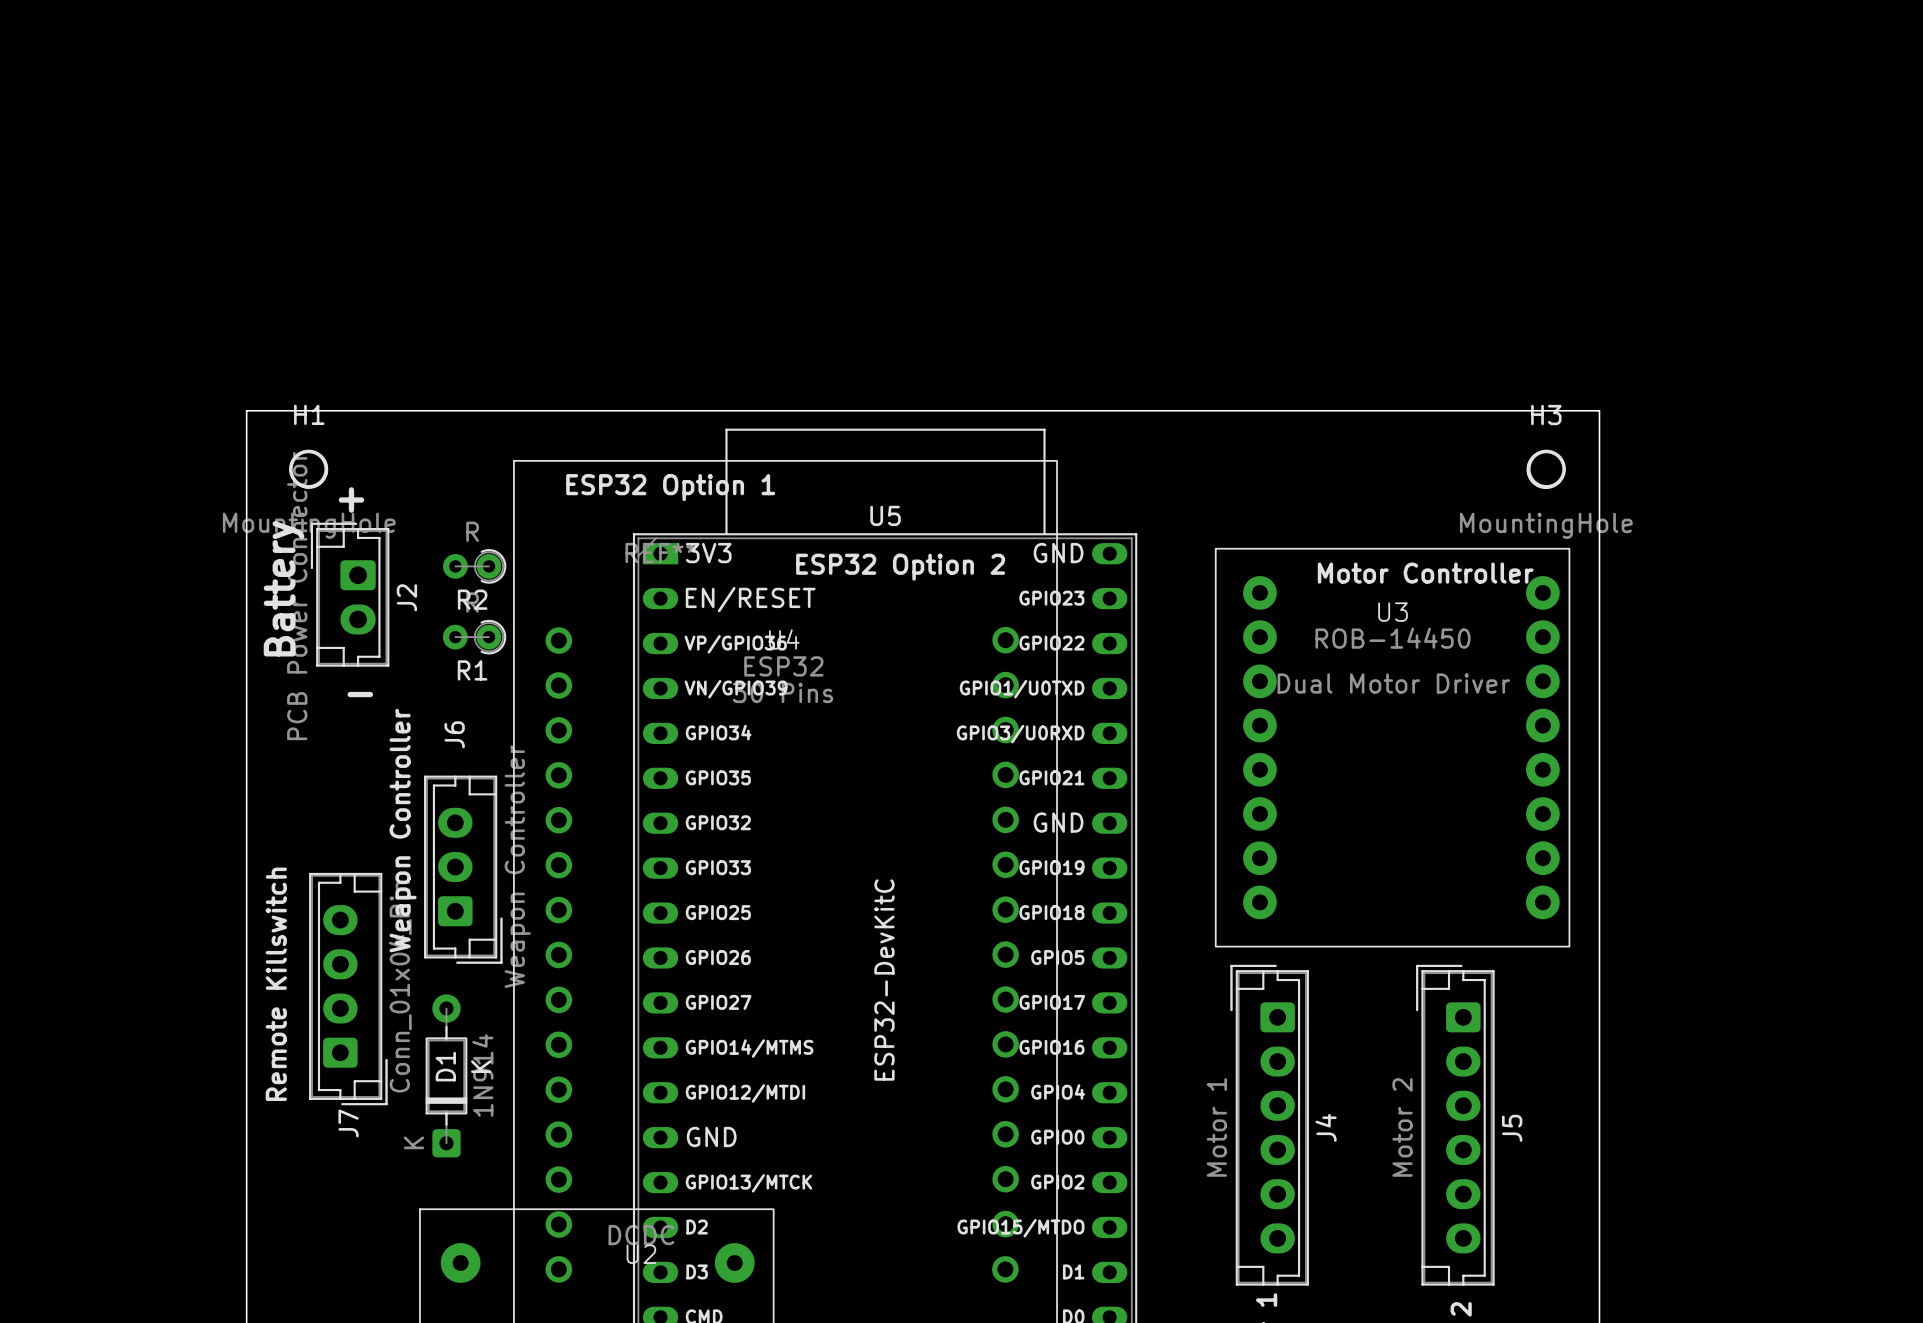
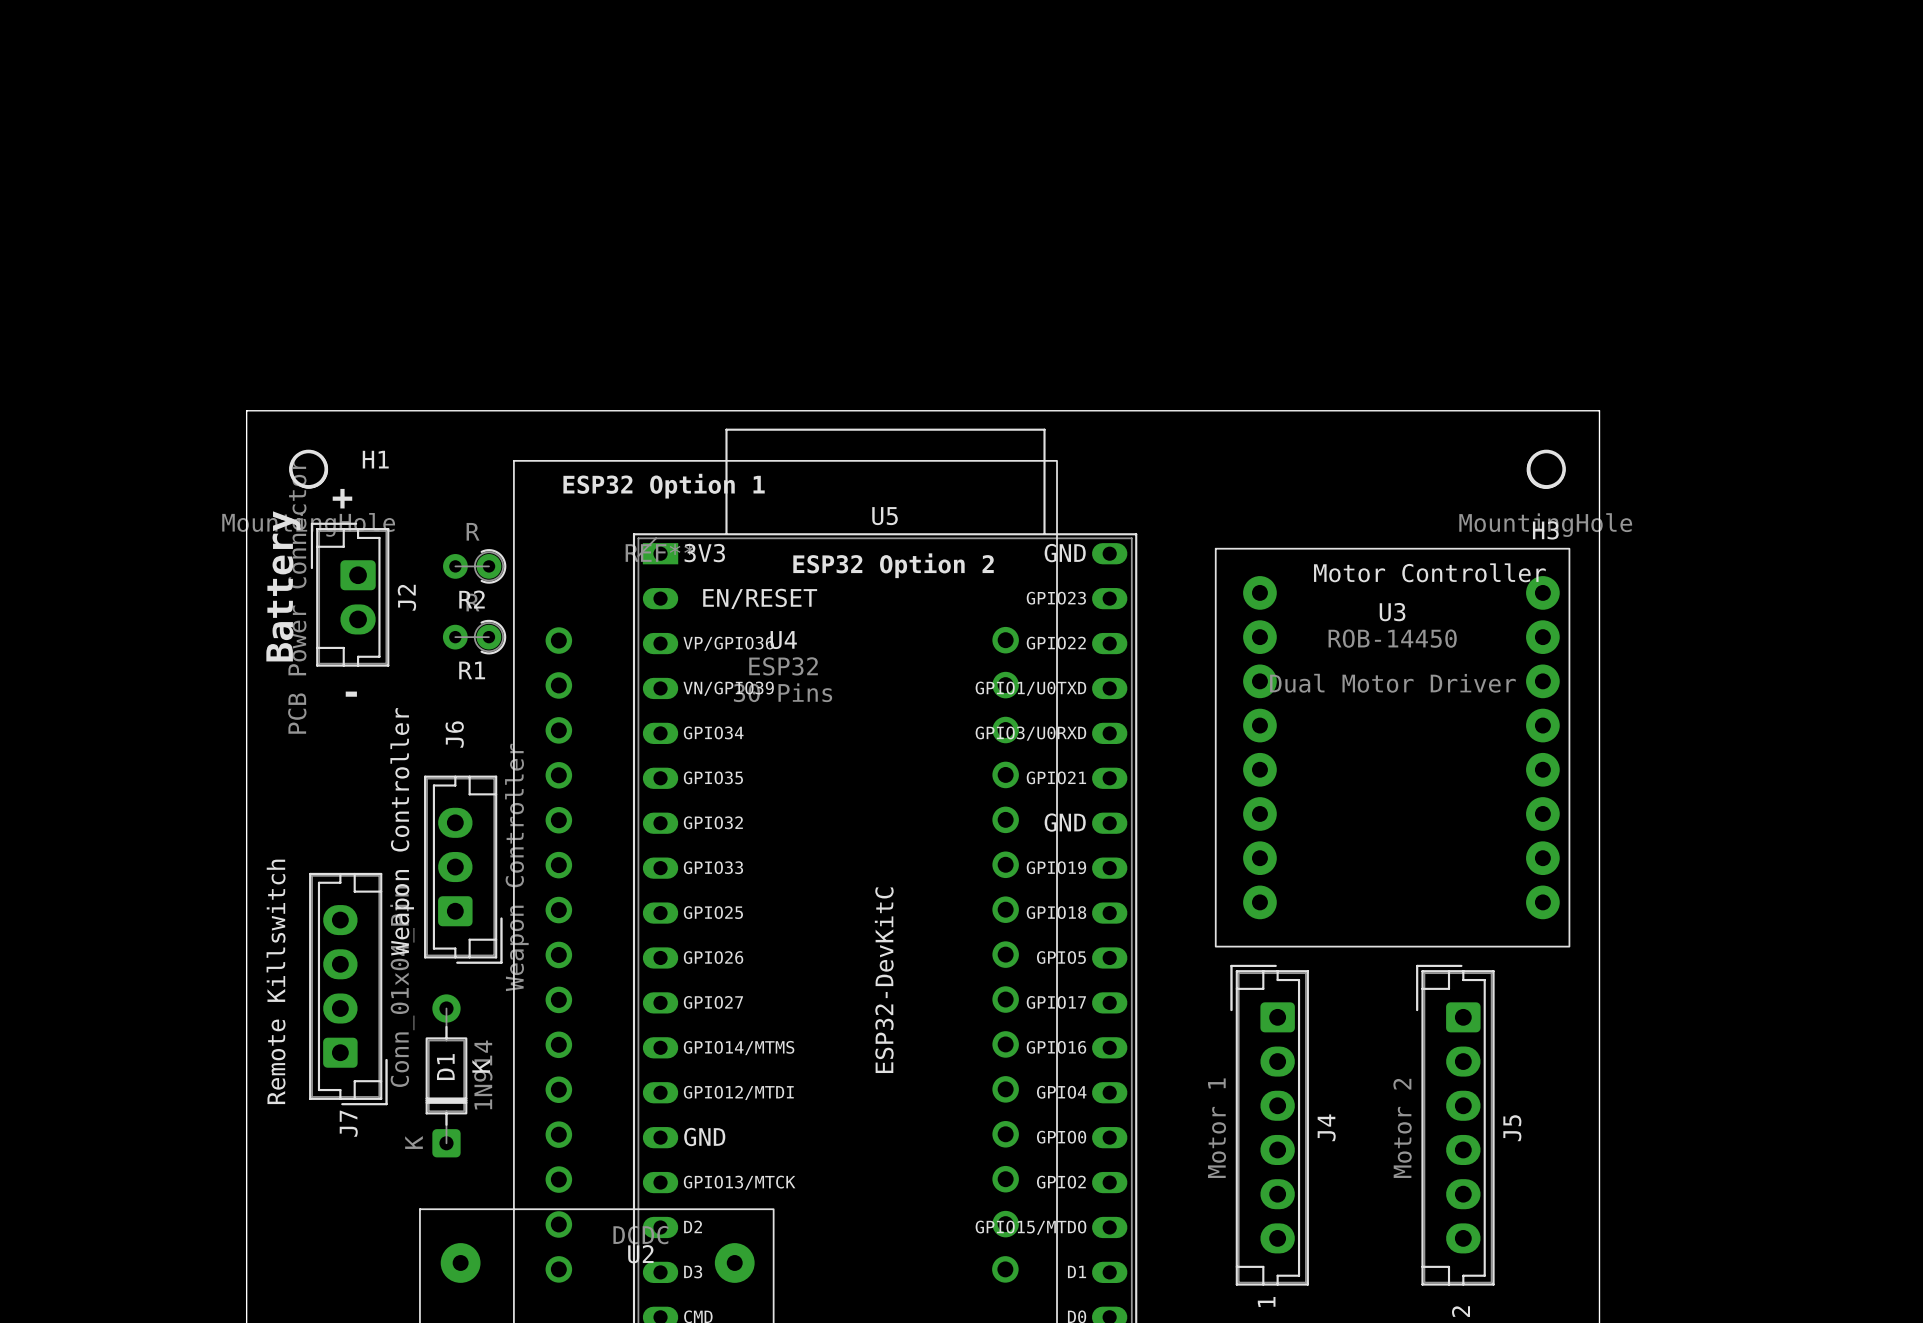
H1 name position: H1 (309, 414) -> H1 (375, 459)
H3 name position: H3 (1546, 415) -> H3 (1545, 530)

